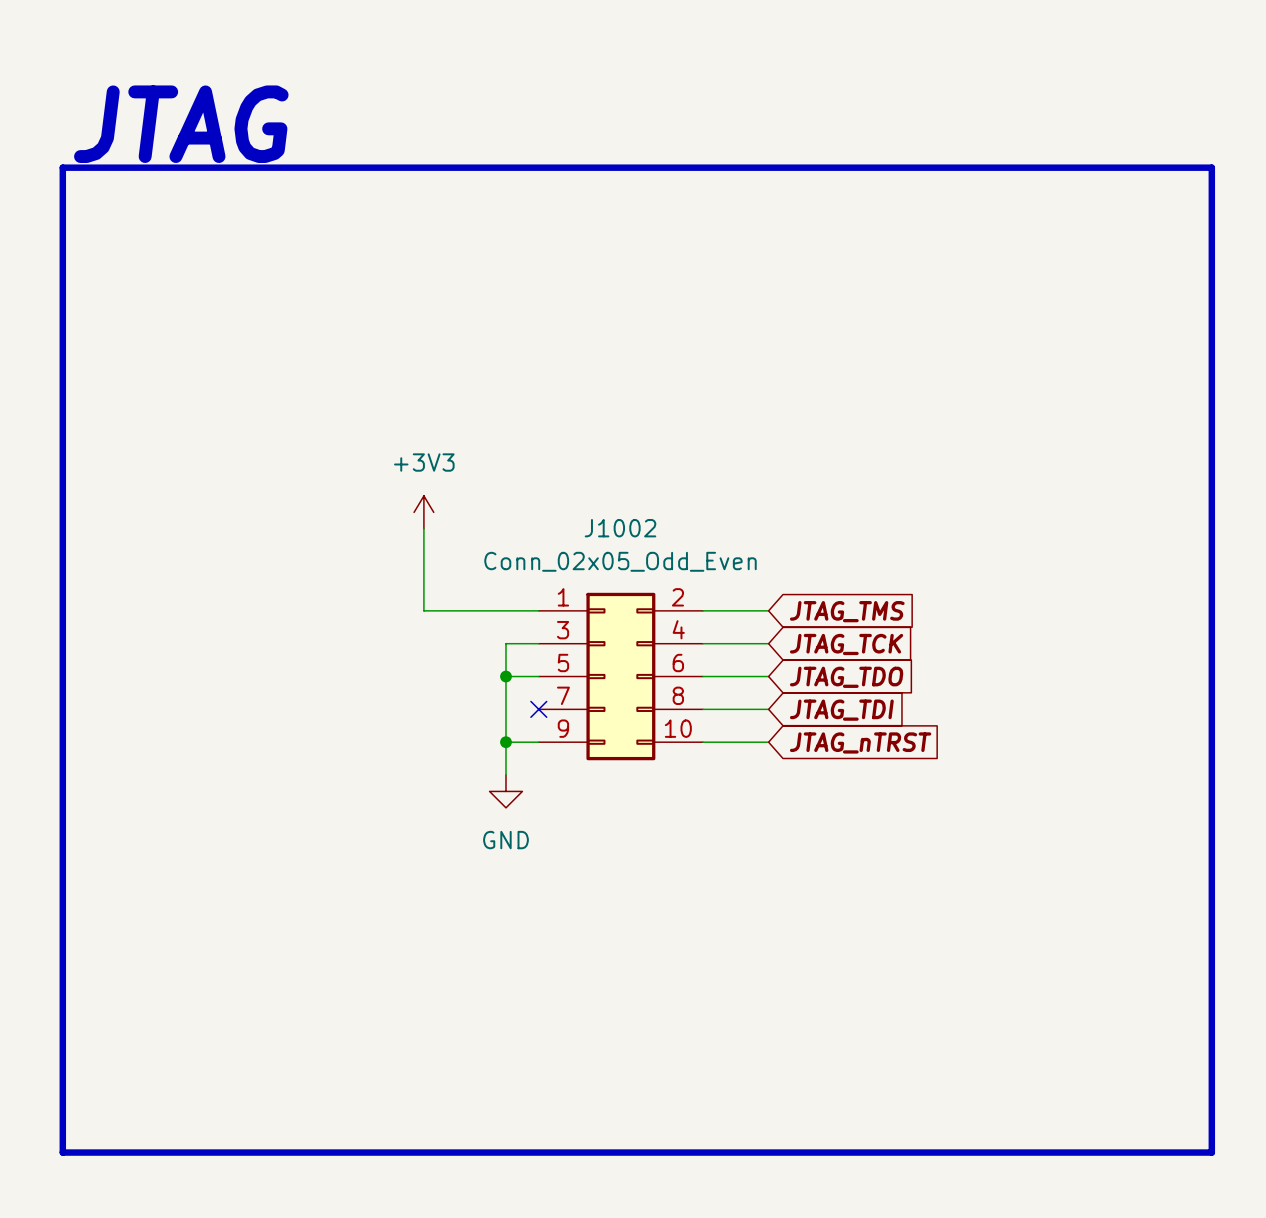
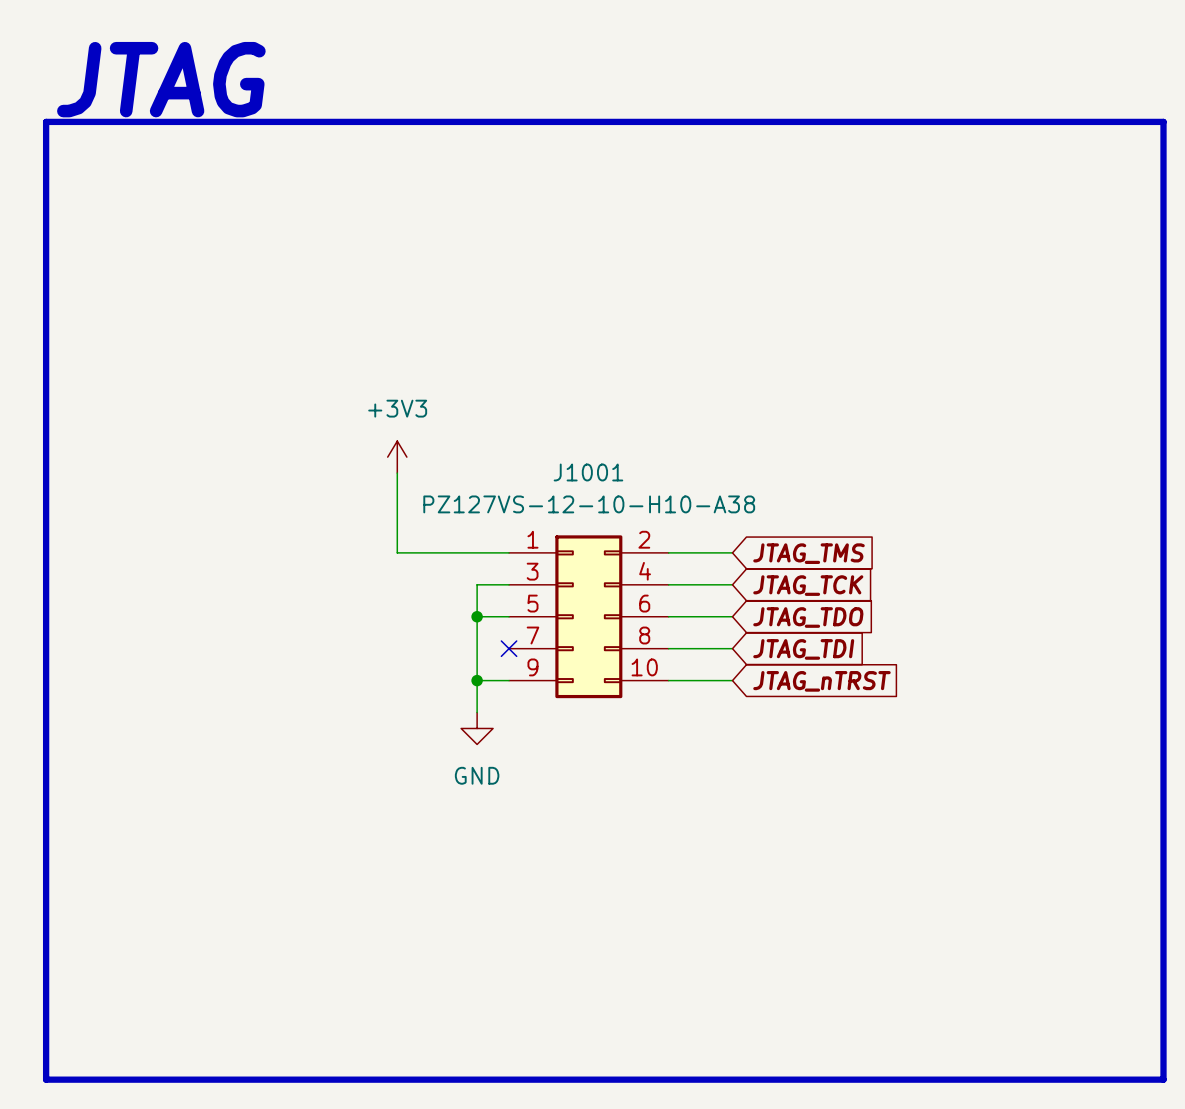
J1002 name: J1002 (620, 528) -> J1001 (588, 472)
J1002 value: Conn_02x05_Odd_Even (620, 561) -> PZ127VS-12-10-H10-A38 (589, 504)

